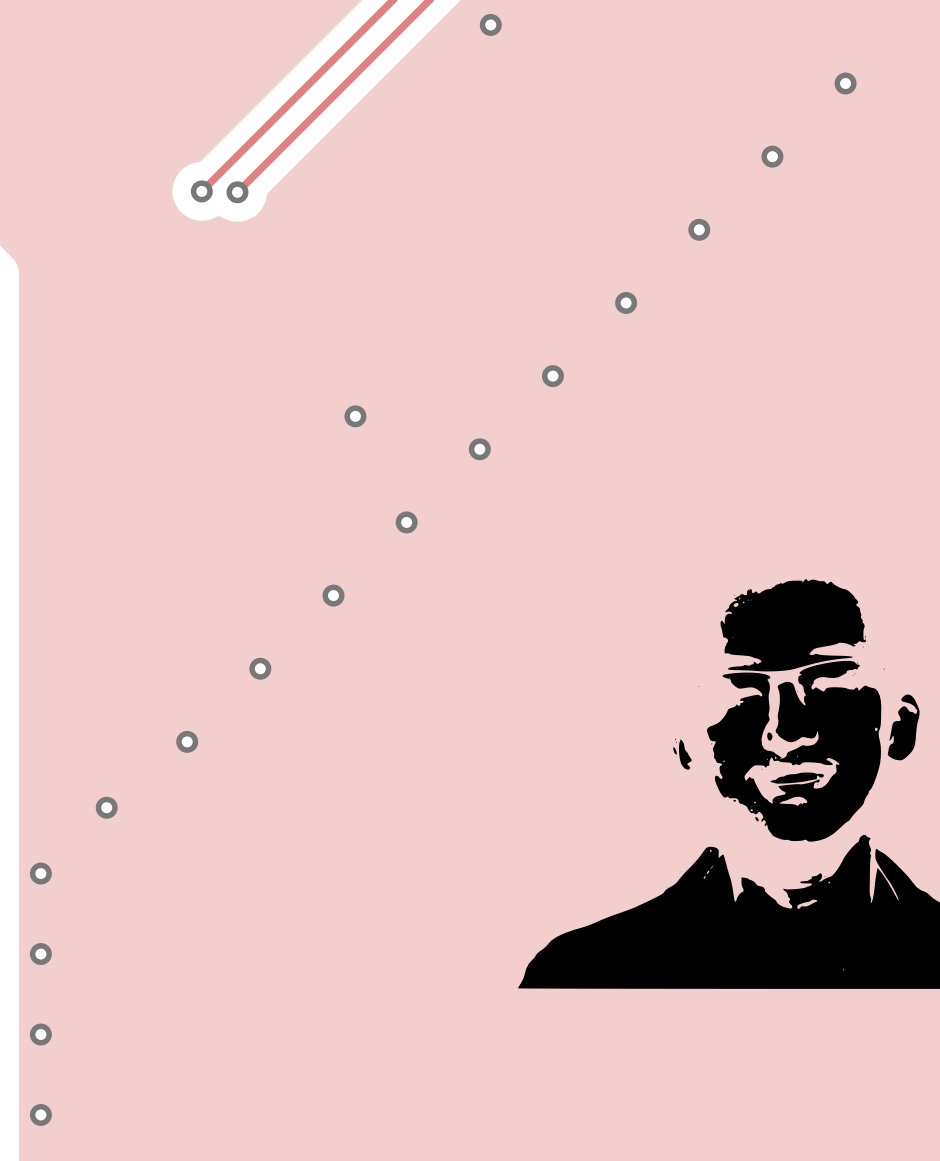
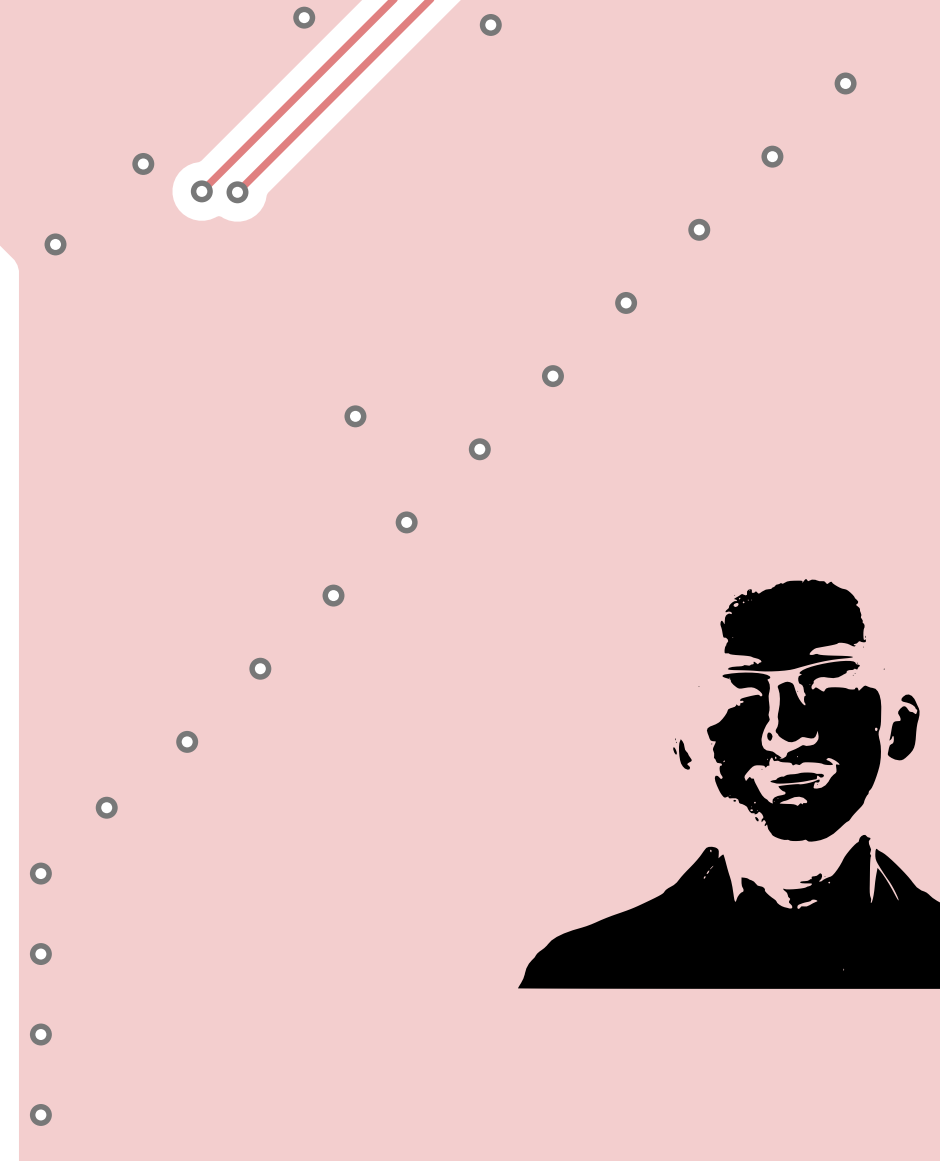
via: none -> (304, 17)
via: none -> (143, 163)
via: none -> (55, 244)

